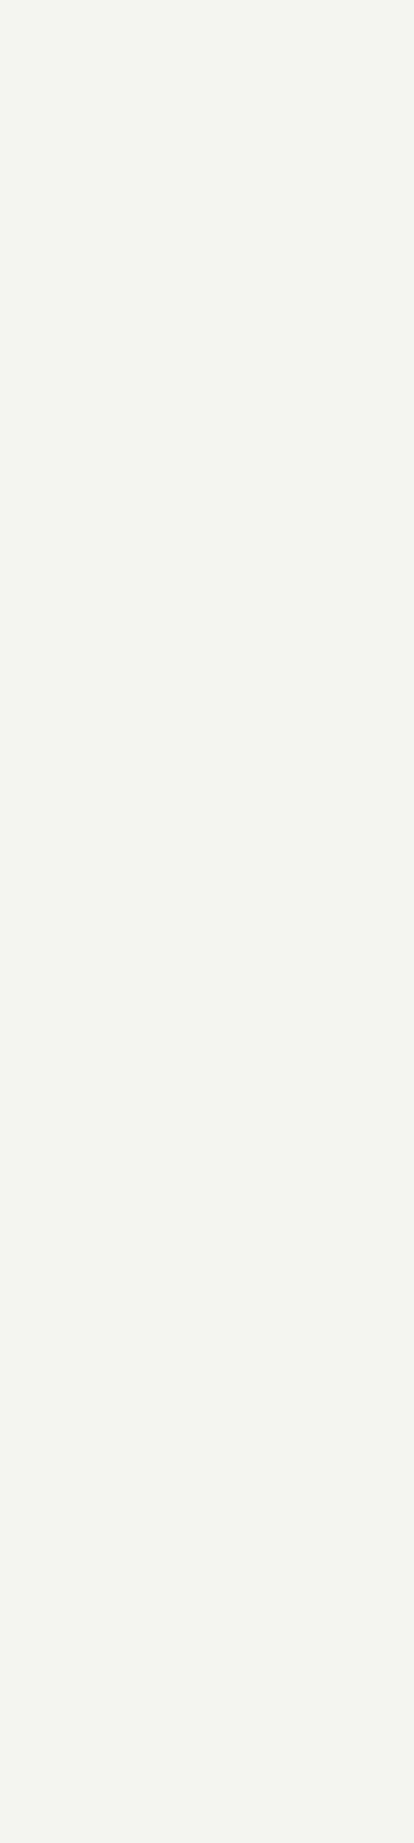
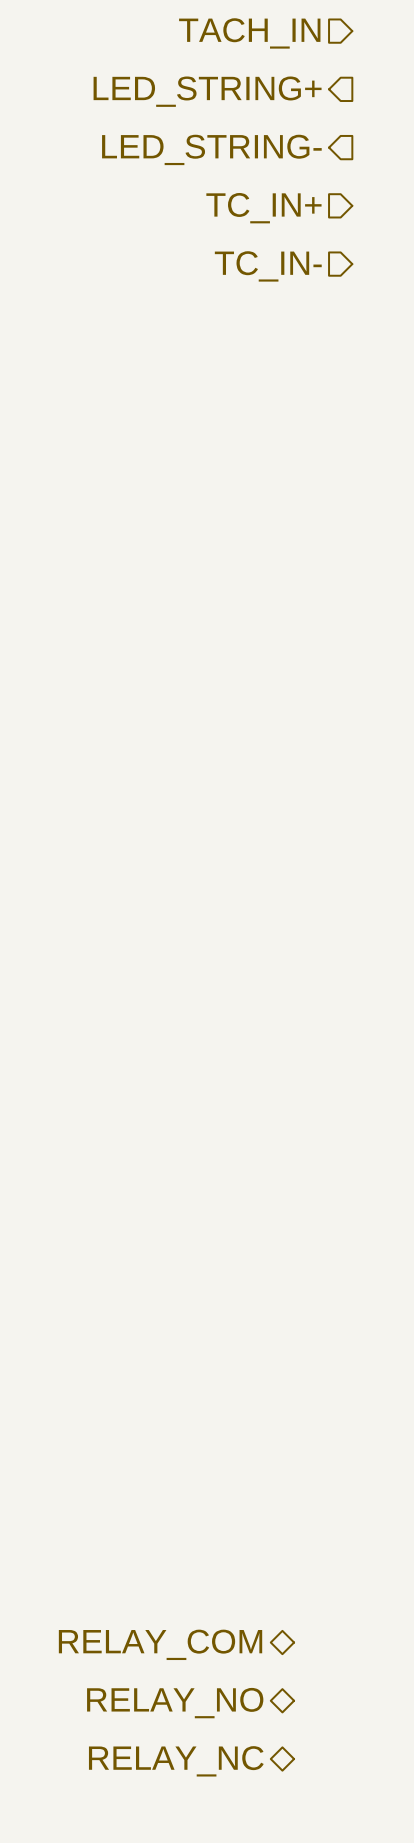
hierarchical label: none -> TACH_IN (249, 33)
hierarchical label: none -> LED_STRING+ (207, 91)
hierarchical label: none -> LED_STRING- (211, 149)
hierarchical label: none -> TC_IN+ (263, 208)
hierarchical label: none -> TC_IN- (268, 266)
hierarchical label: none -> RELAY_COM (160, 1644)
hierarchical label: none -> RELAY_NO (175, 1703)
hierarchical label: none -> RELAY_NC (176, 1761)

